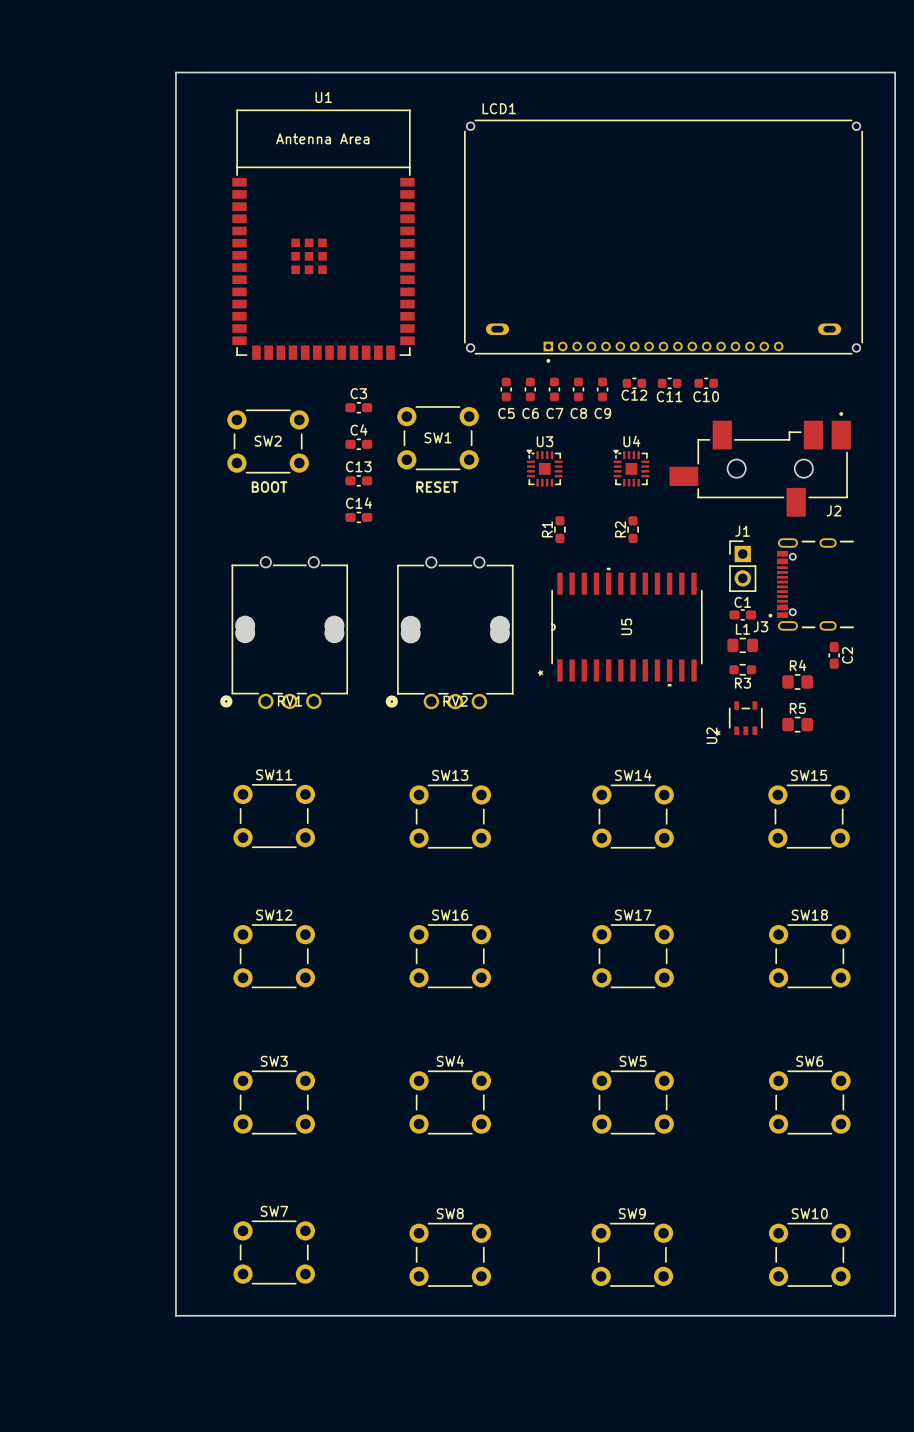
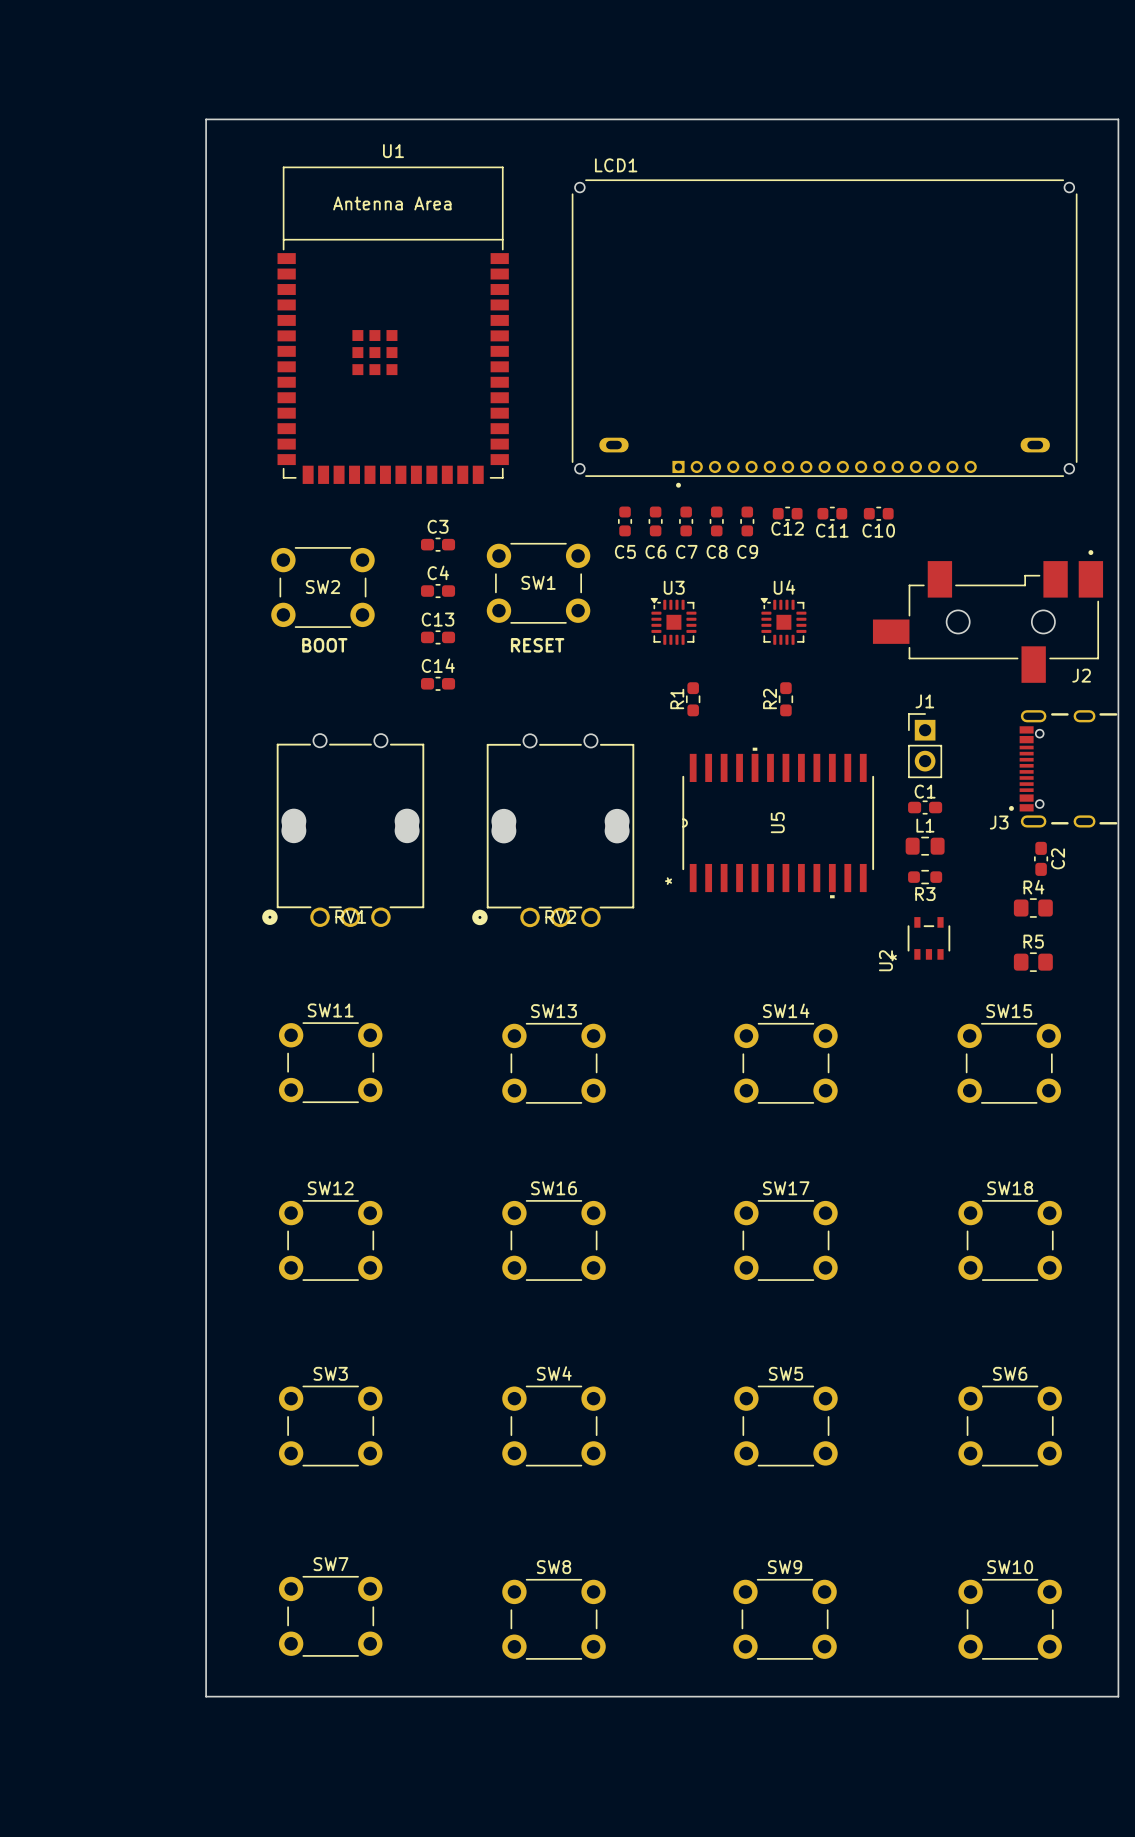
J2 position: (760, 464) -> (988, 616)
J3 position: (811, 584) -> (1063, 768)
R4 position: (797, 681) -> (1033, 908)
R5 position: (797, 724) -> (1033, 962)

